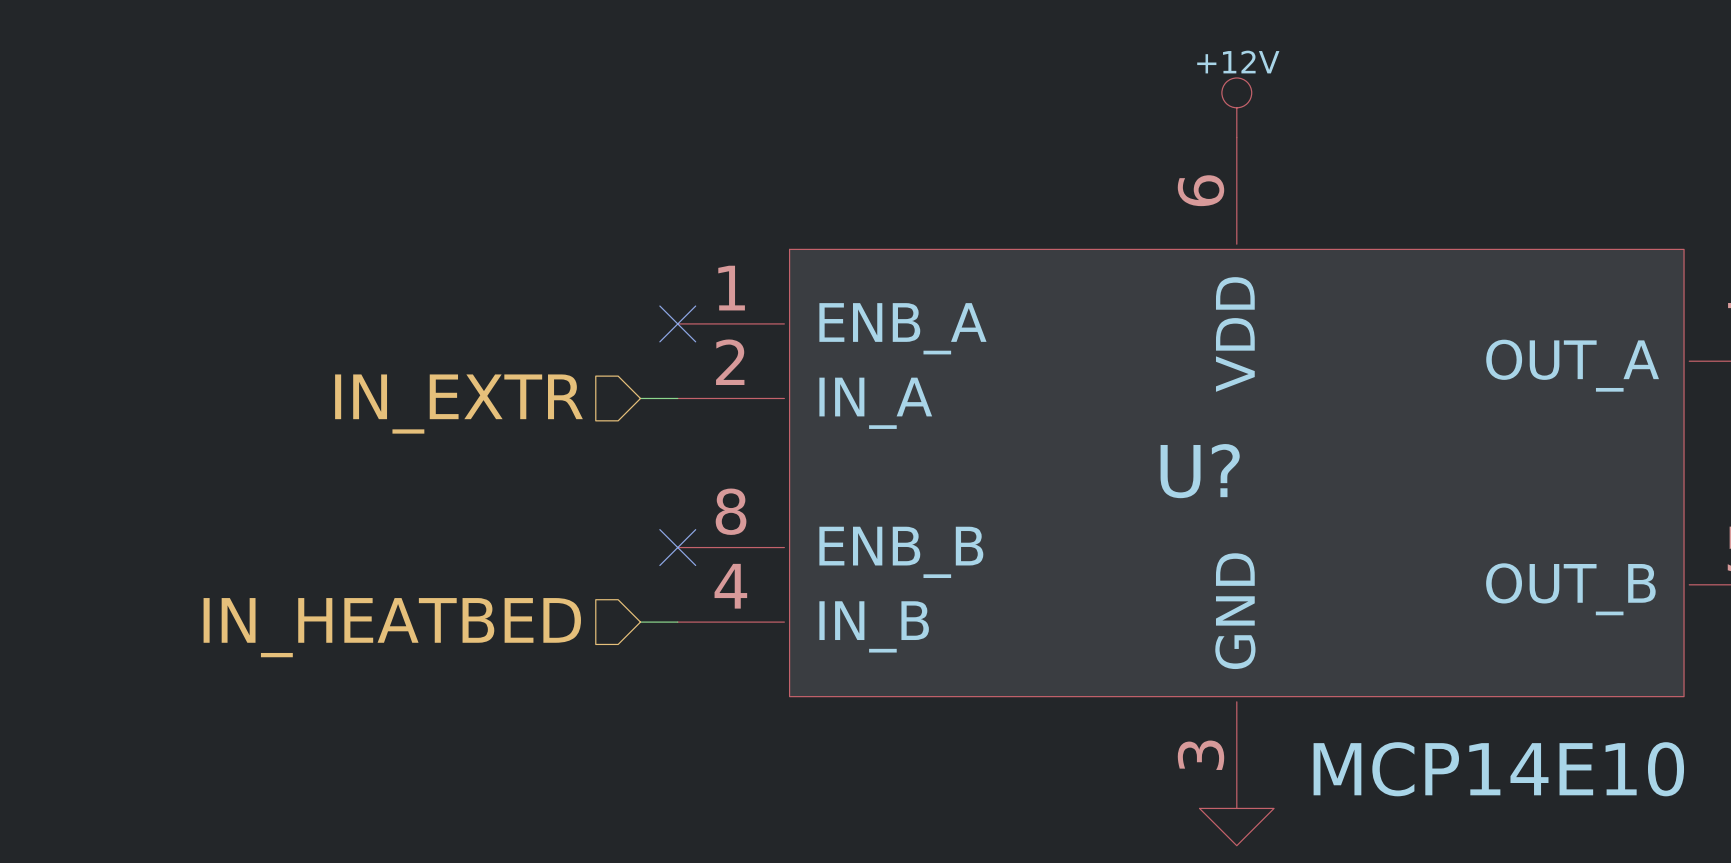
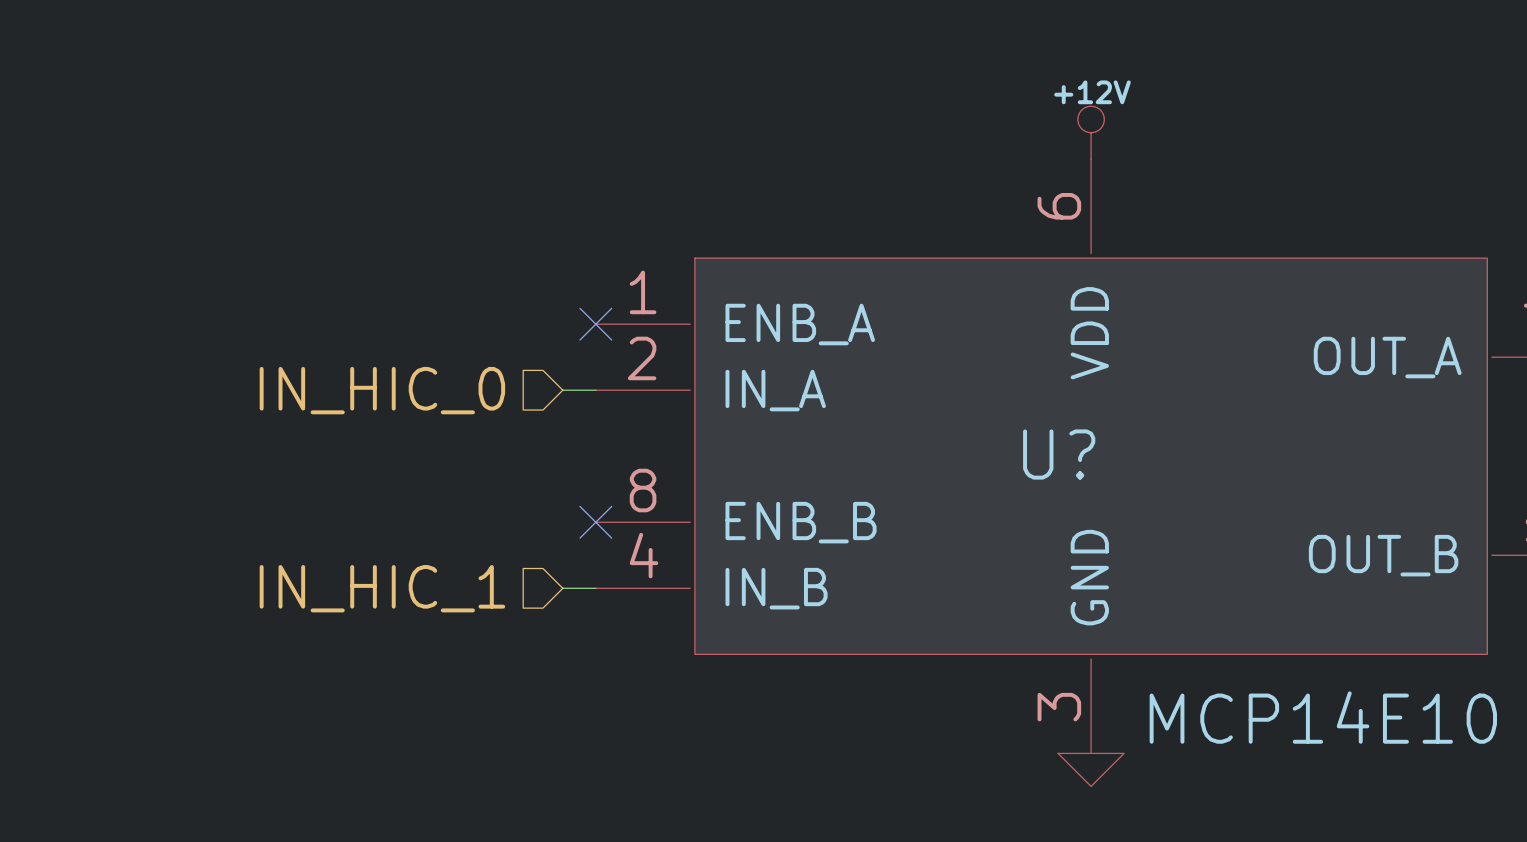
hierarchical label: IN_EXTR (458, 404) -> IN_HIC_0 (382, 390)
hierarchical label: IN_HEATBED (392, 627) -> IN_HIC_1 (382, 588)

